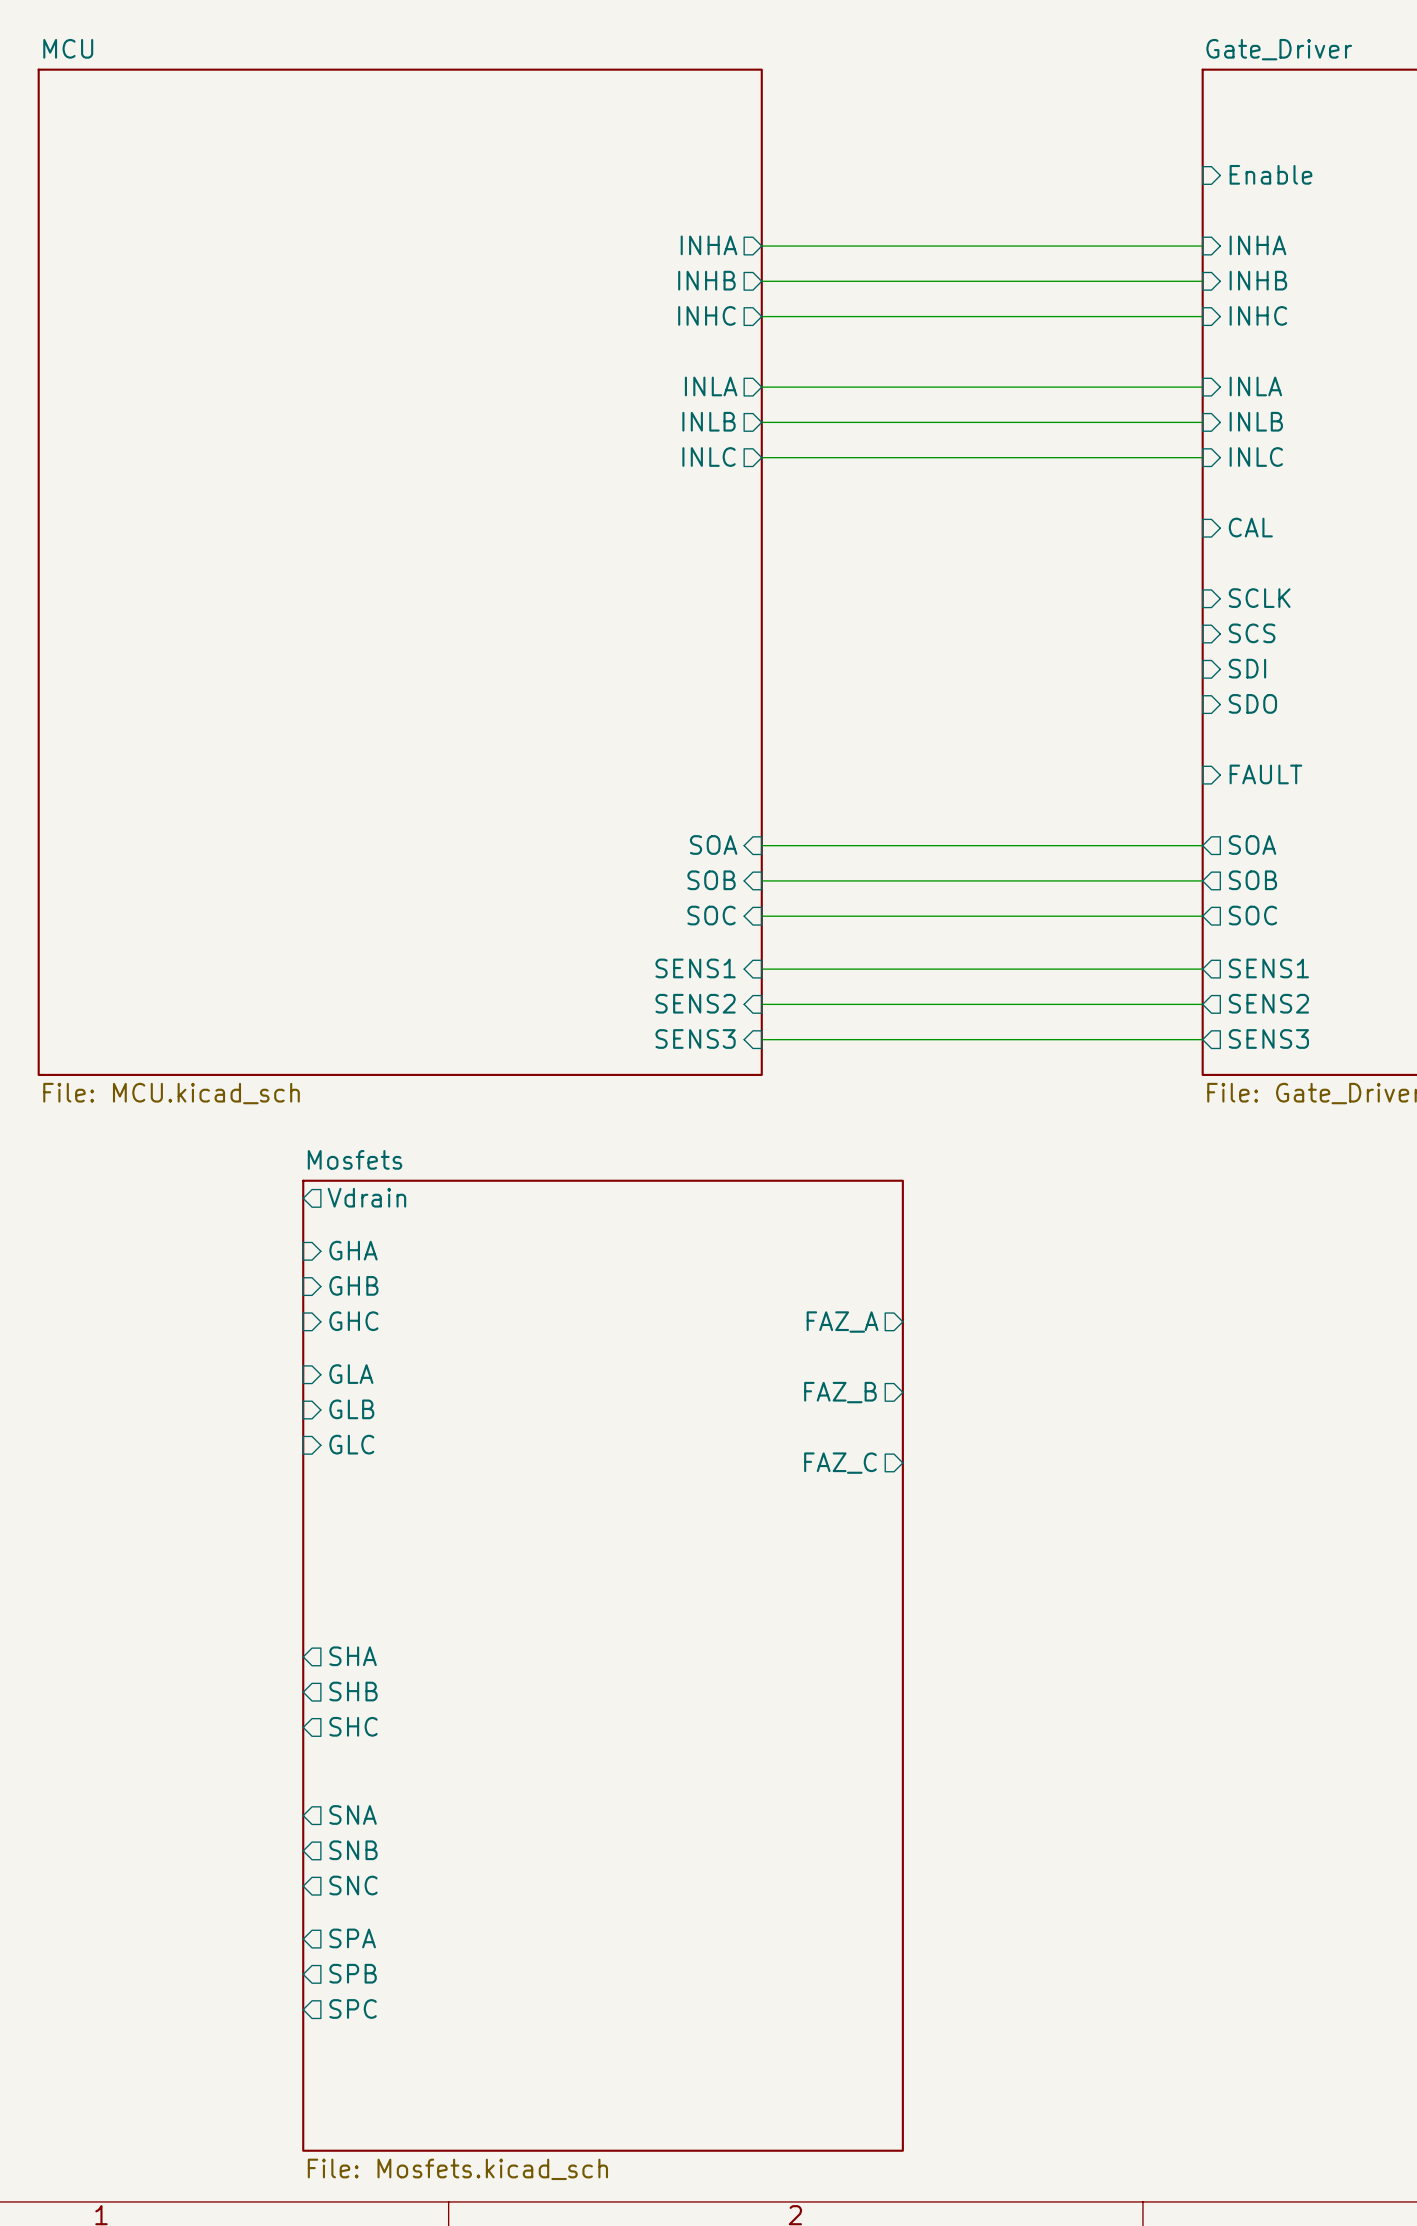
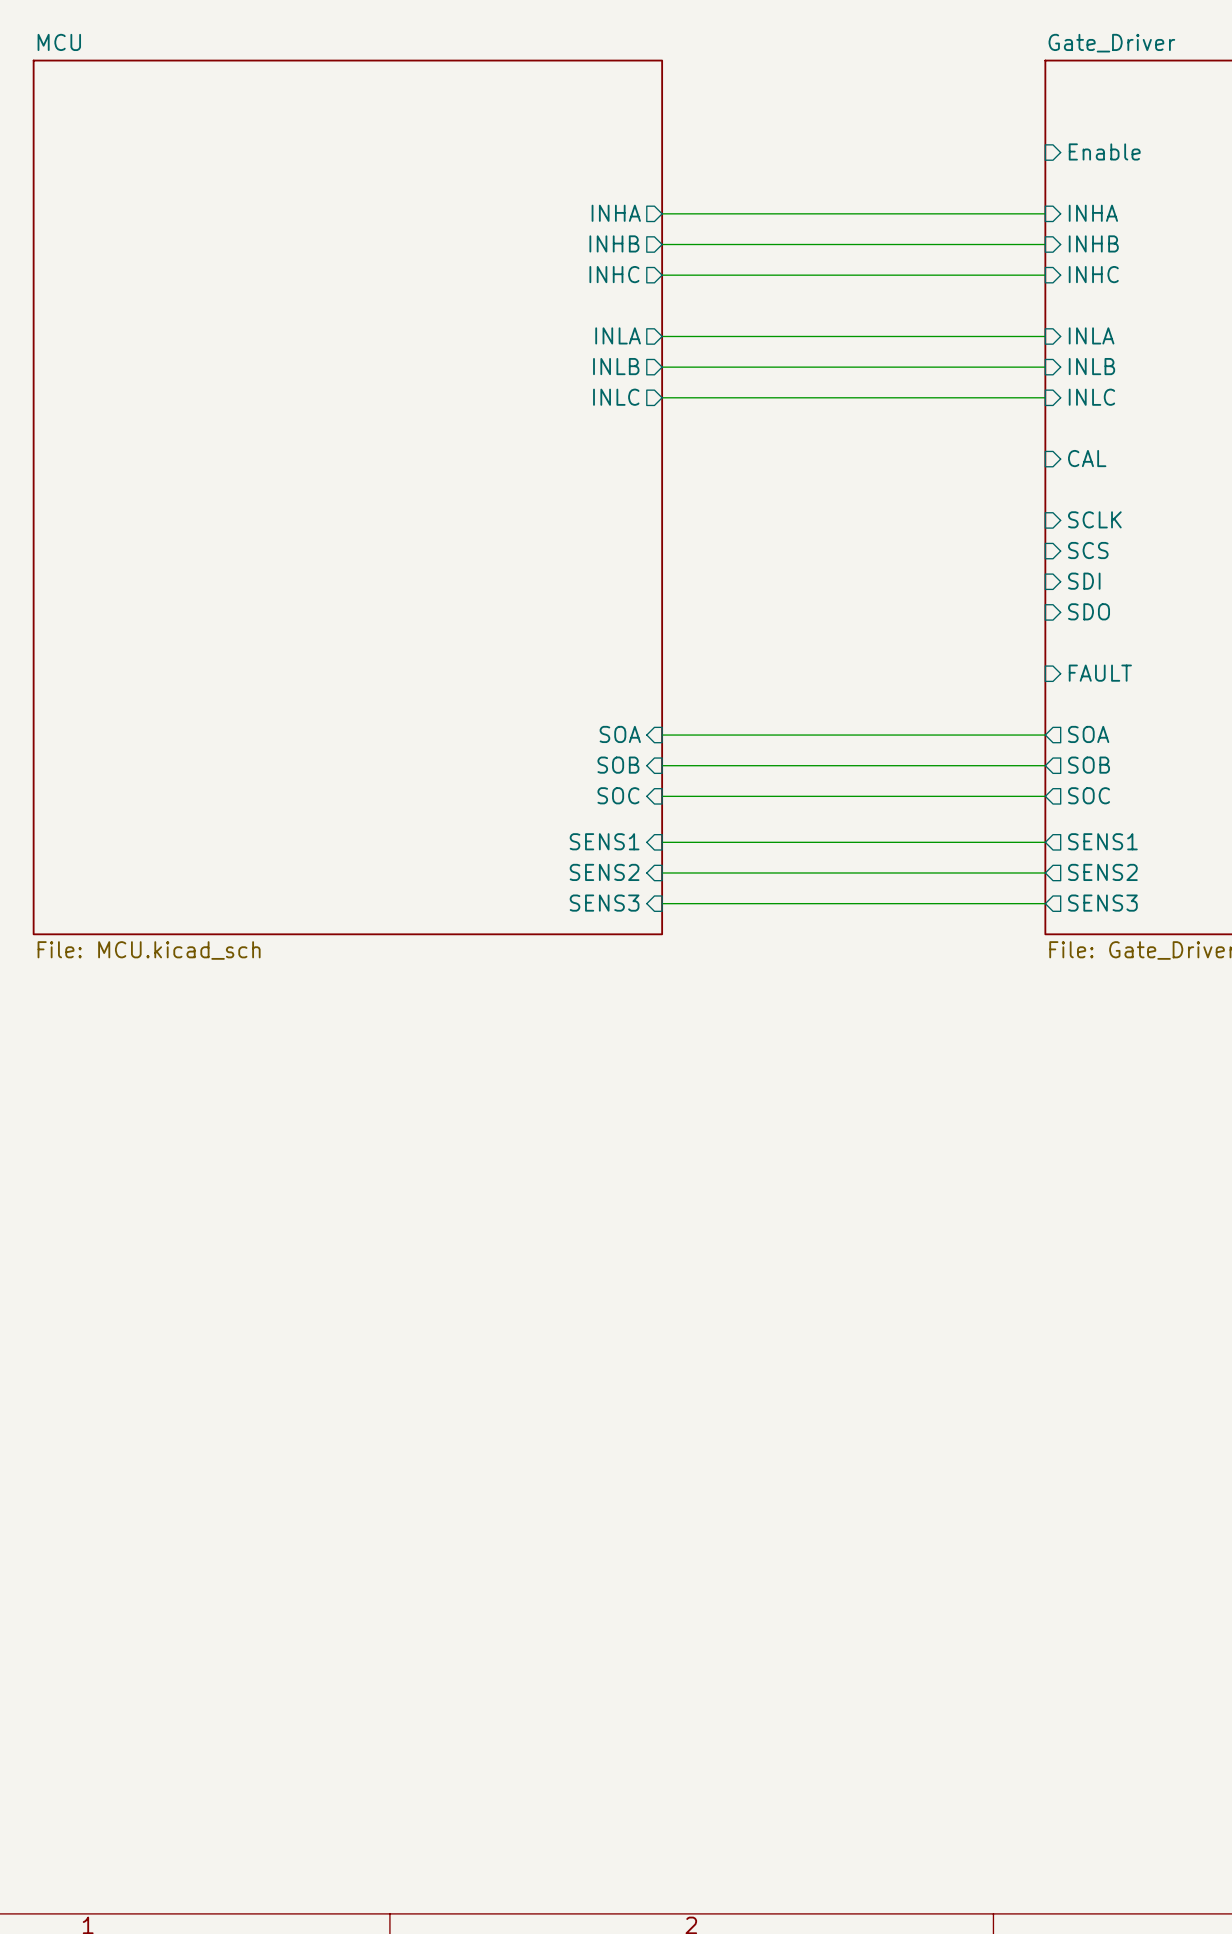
sheet pin: Vdrain (366, 1197) -> none
sheet pin: GHA (353, 1250) -> none
sheet pin: GHB (353, 1285) -> none
sheet pin: GHC (353, 1321) -> none
sheet pin: FAZ_A (842, 1322) -> none
sheet pin: GLA (351, 1374) -> none
sheet pin: FAZ_B (840, 1392) -> none
sheet pin: GLB (351, 1409) -> none
sheet pin: GLC (351, 1444) -> none
sheet pin: FAZ_C (840, 1463) -> none
sheet pin: SHA (353, 1656) -> none
sheet Mosfets: File: Mosfets.kicad_sch (603, 1665) -> none
sheet pin: SHB (353, 1691) -> none
sheet pin: SHC (353, 1726) -> none
sheet pin: SNA (353, 1814) -> none
sheet pin: SNB (353, 1850) -> none
sheet pin: SNC (353, 1885) -> none
sheet pin: SPA (352, 1938) -> none
sheet pin: SPB (353, 1973) -> none
sheet pin: SPC (353, 2008) -> none

